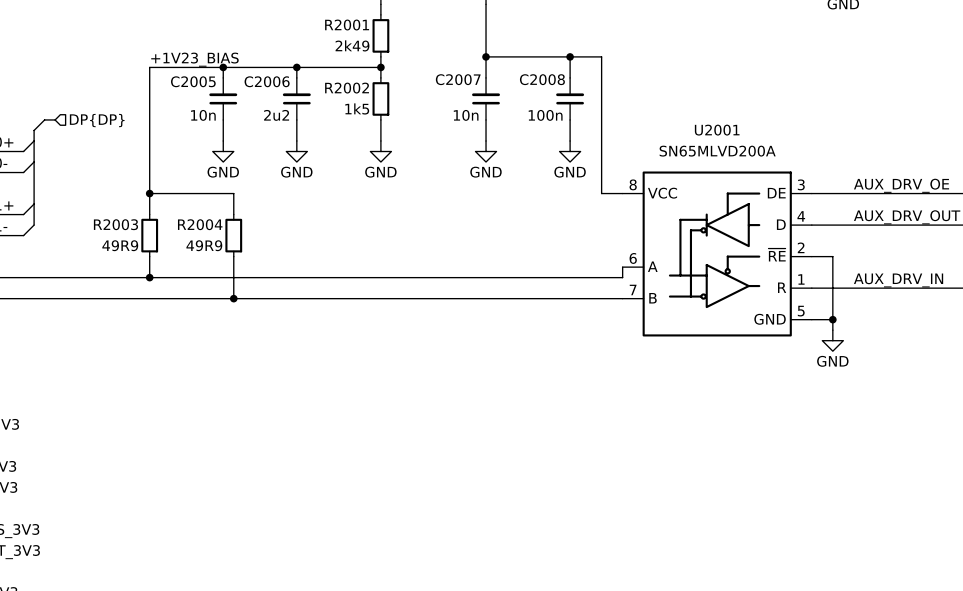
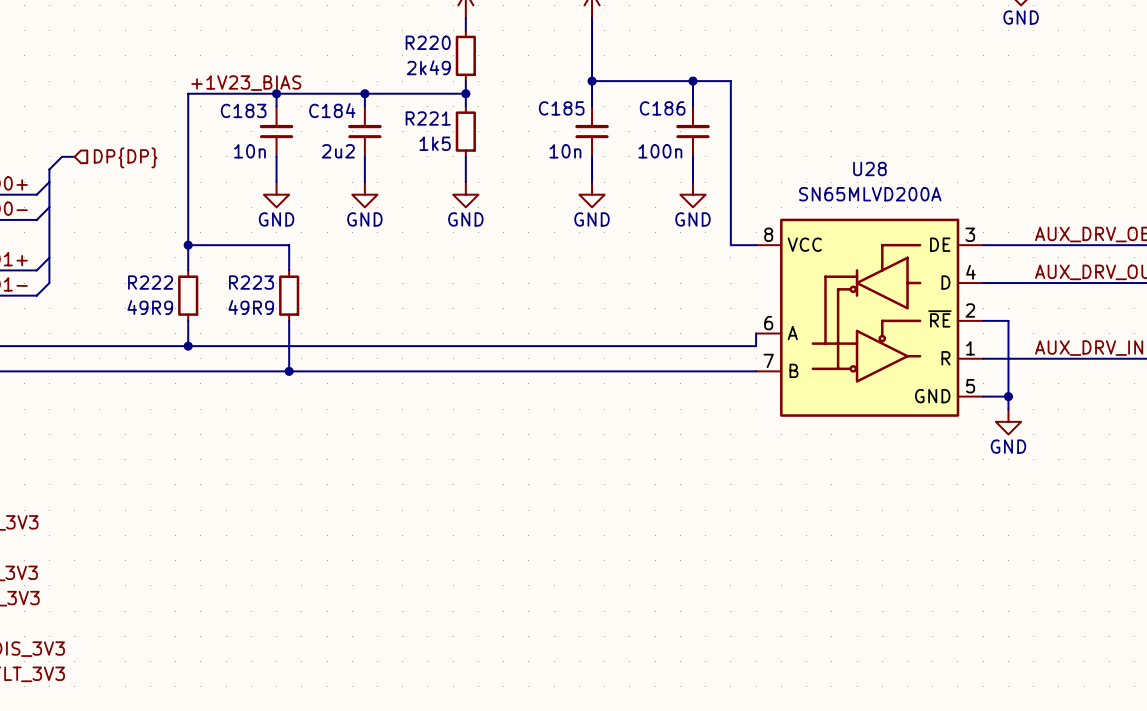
R2001 name: R2001 (347, 25) -> R220 (428, 42)
C2007 name: C2007 (458, 79) -> C185 (561, 108)
C2008 name: C2008 (542, 79) -> C186 (662, 108)
C2005 name: C2005 (193, 81) -> C183 (243, 110)
C2006 name: C2006 (267, 81) -> C184 (332, 110)
R2002 name: R2002 (347, 88) -> R221 (428, 118)
U2001 name: U2001 (717, 130) -> U28 (869, 168)
R2003 name: R2003 (115, 224) -> R222 (150, 282)
R2004 name: R2004 (200, 224) -> R223 (251, 282)

